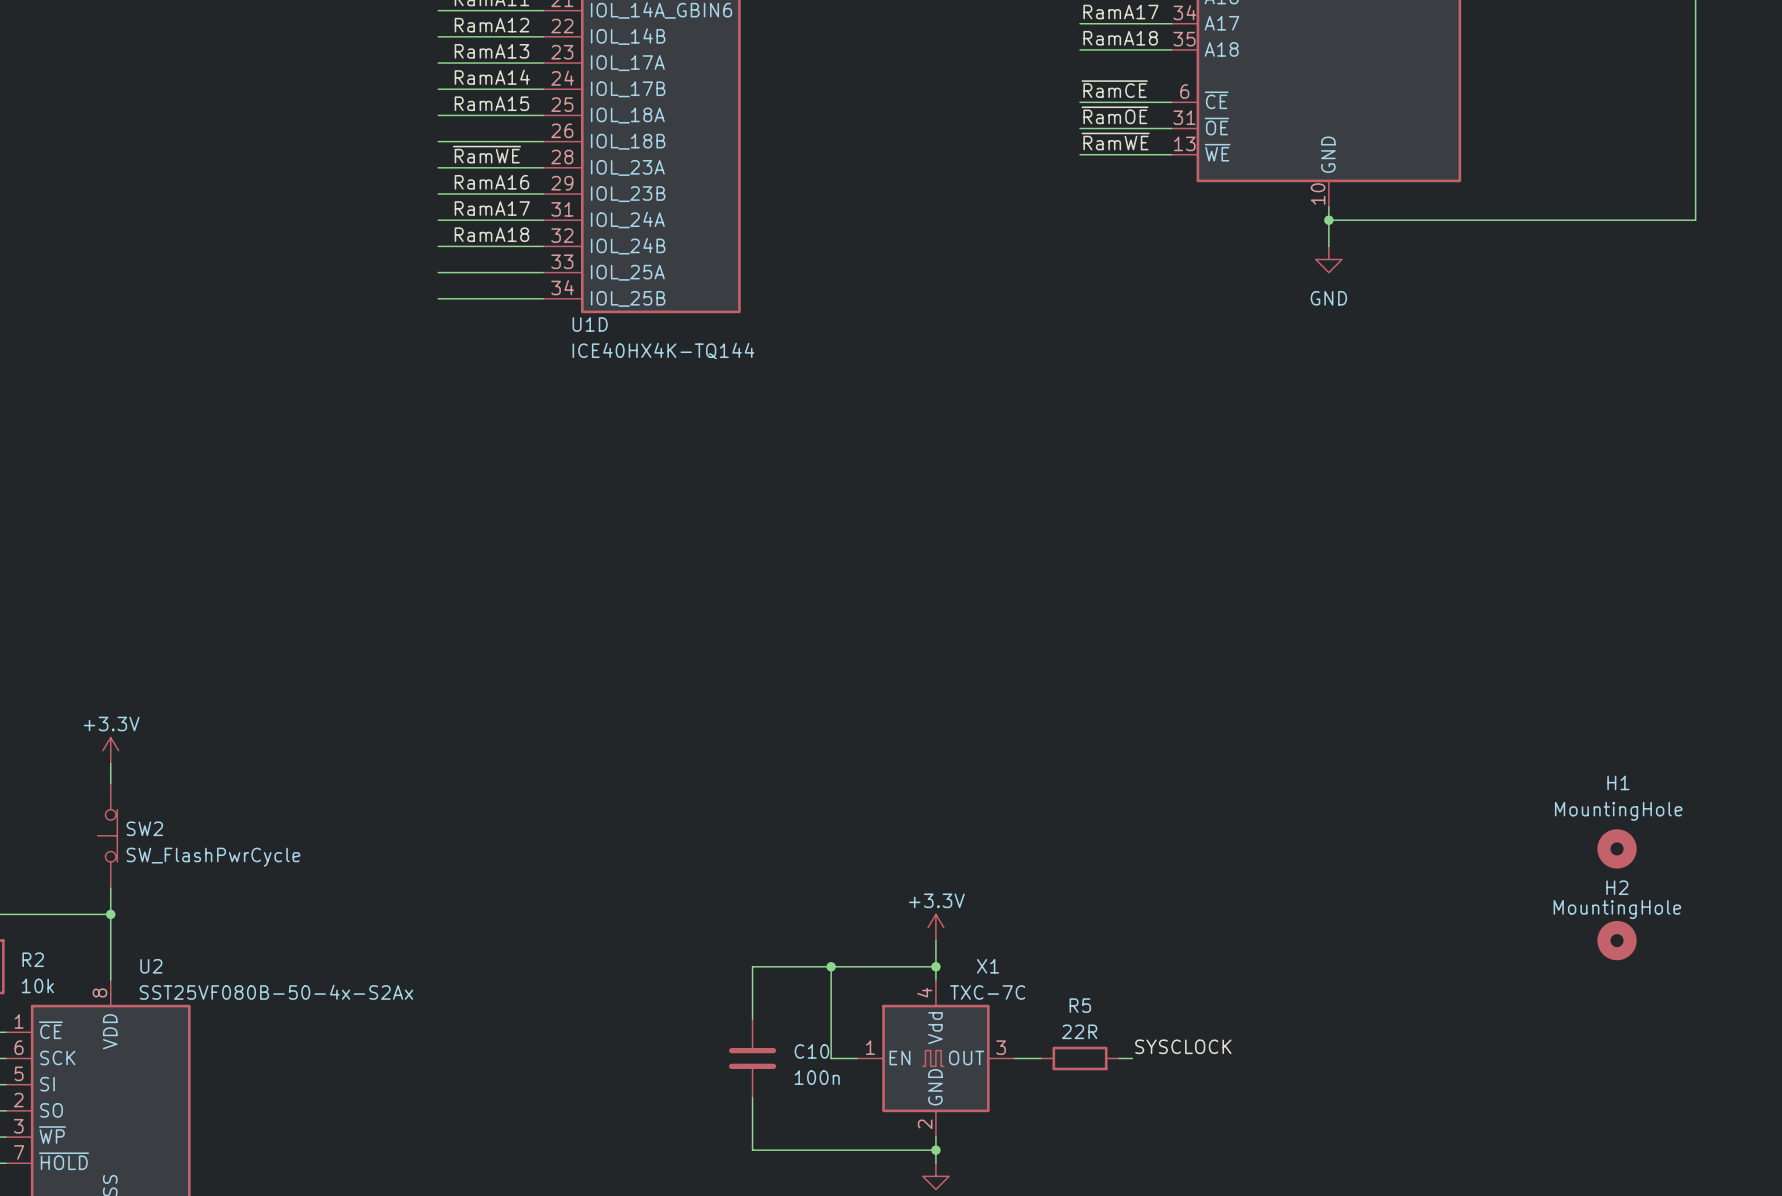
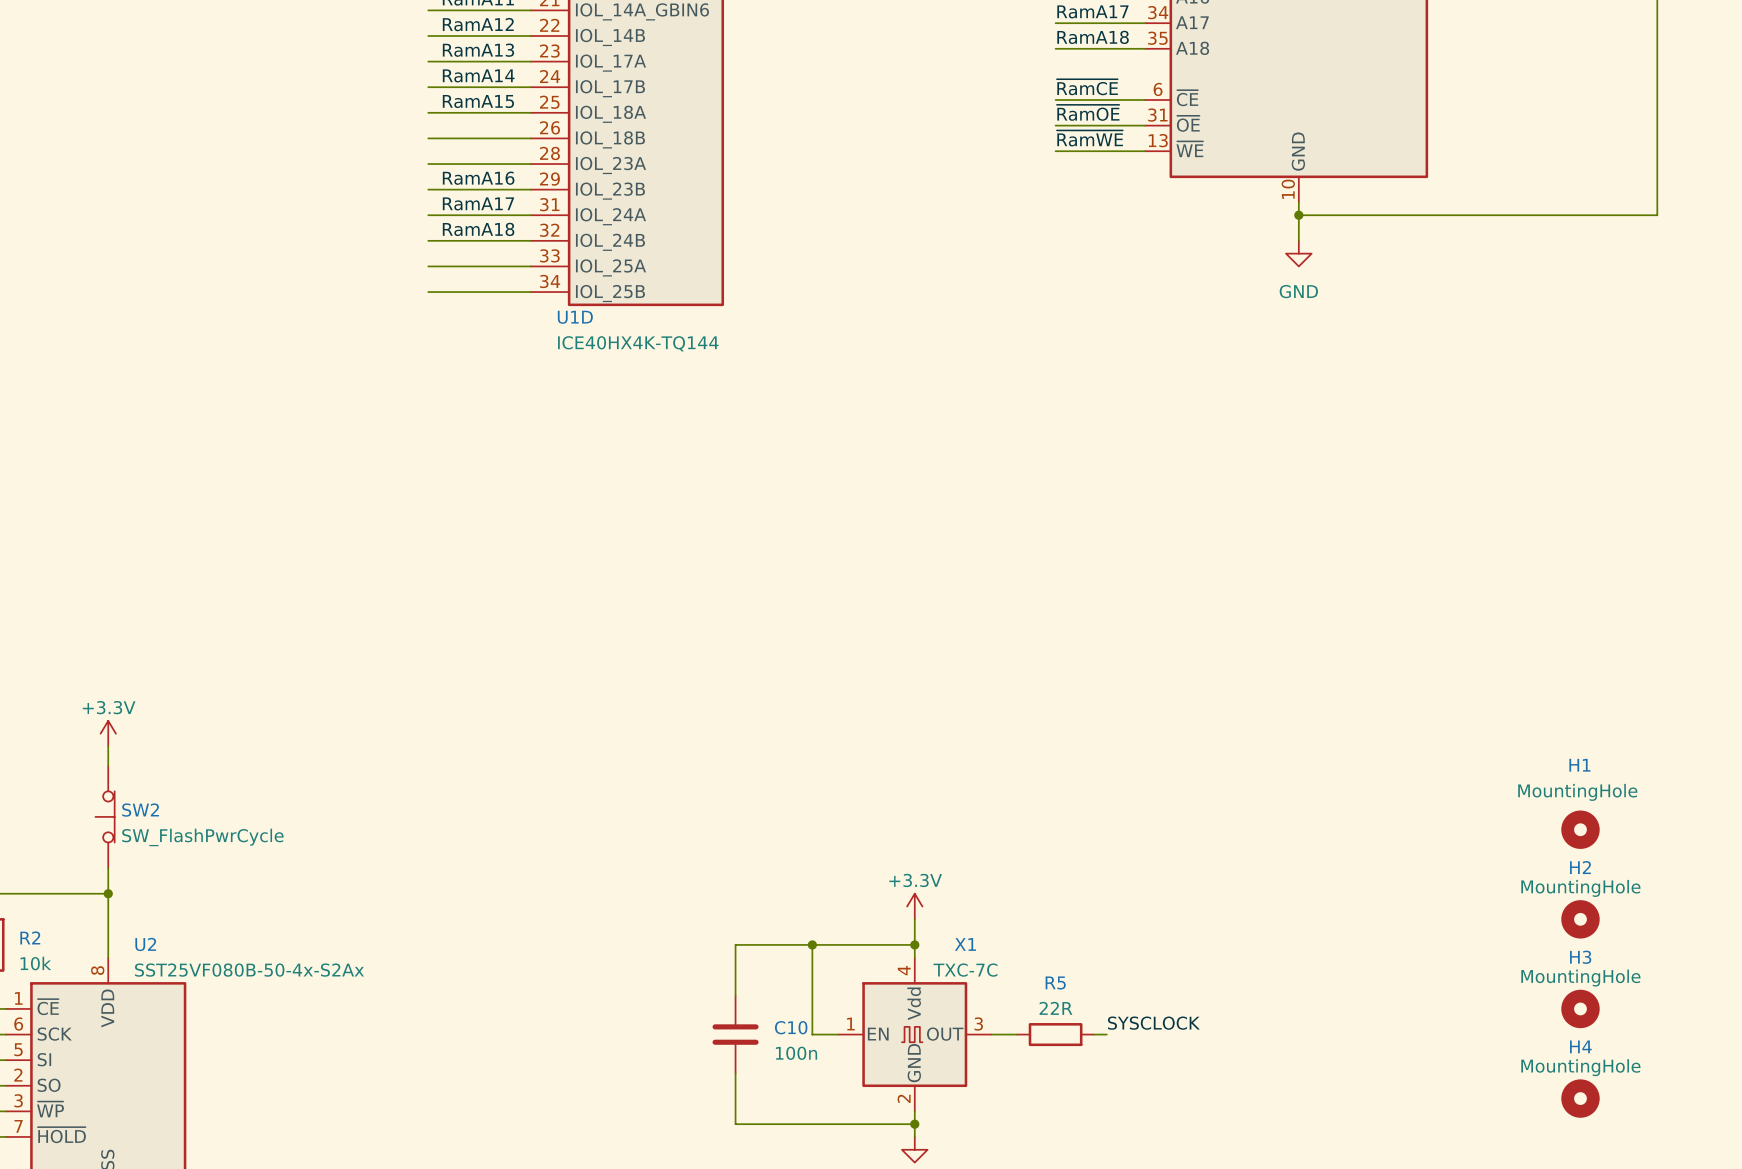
label: ~{RamWE} (486, 154) -> none
H3: none -> MountingHole (1580, 1008)
H4: none -> MountingHole (1580, 1098)

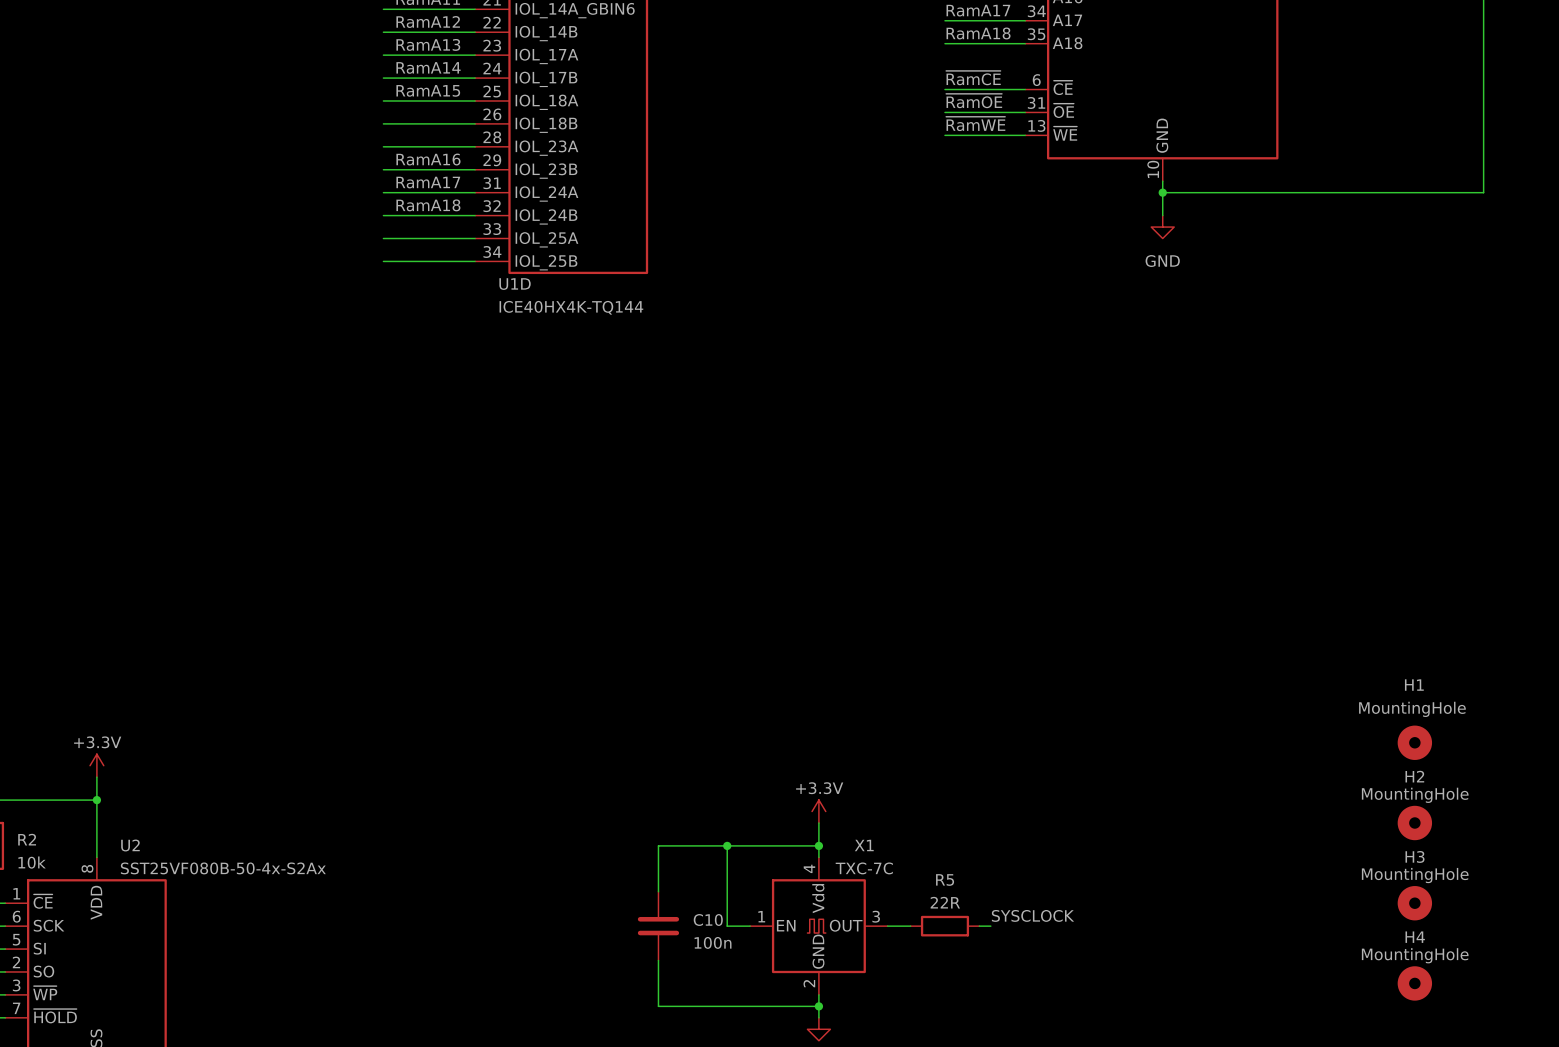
power symbol position: +3.3V (108, 733) -> +3.3V (96, 765)
wire: (108, 746) (108, 765) -> none
SW2: SW_FlashPwrCycle (105, 816) -> none

